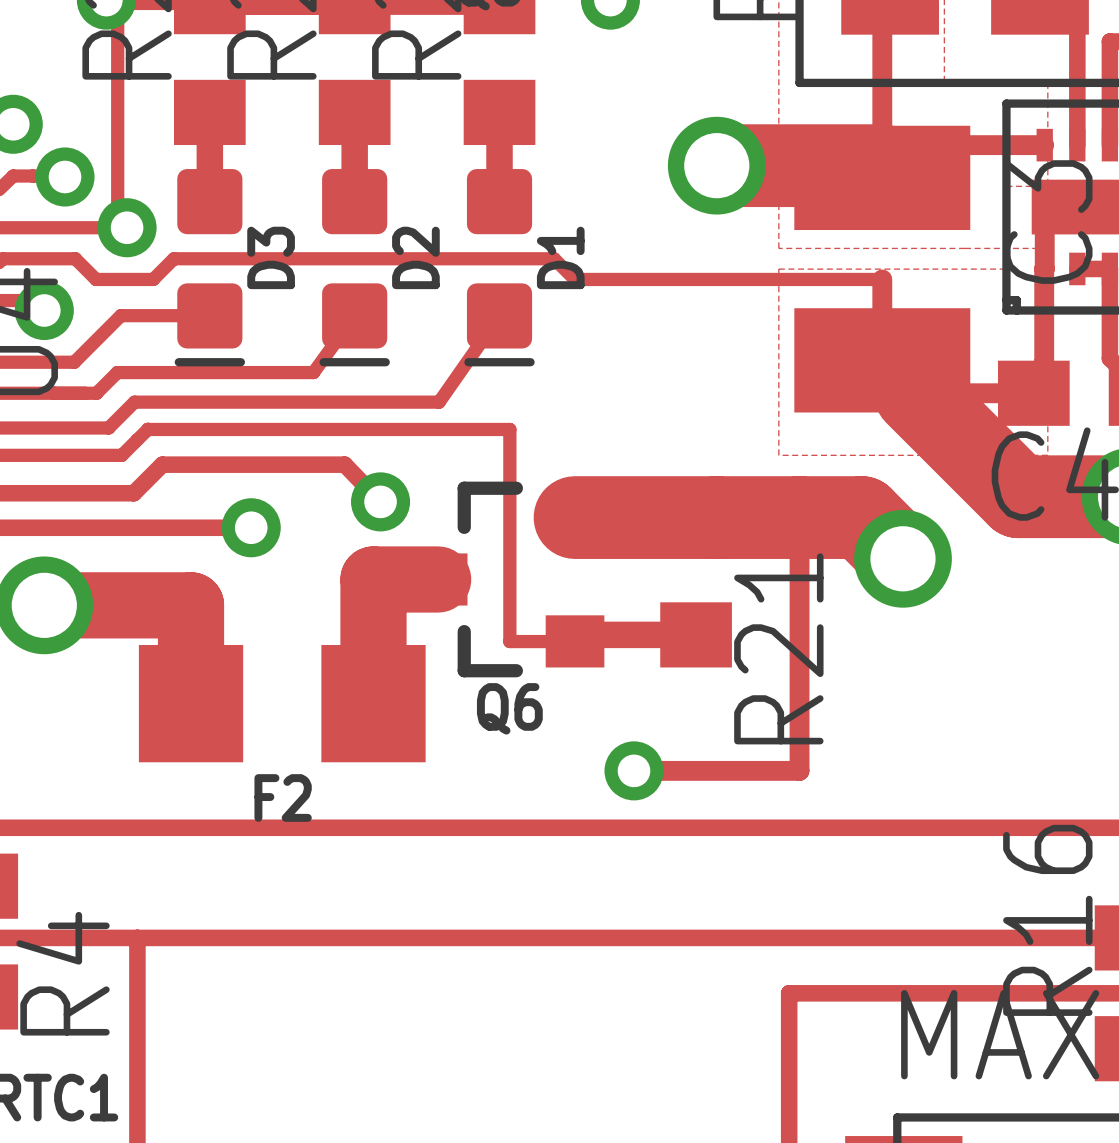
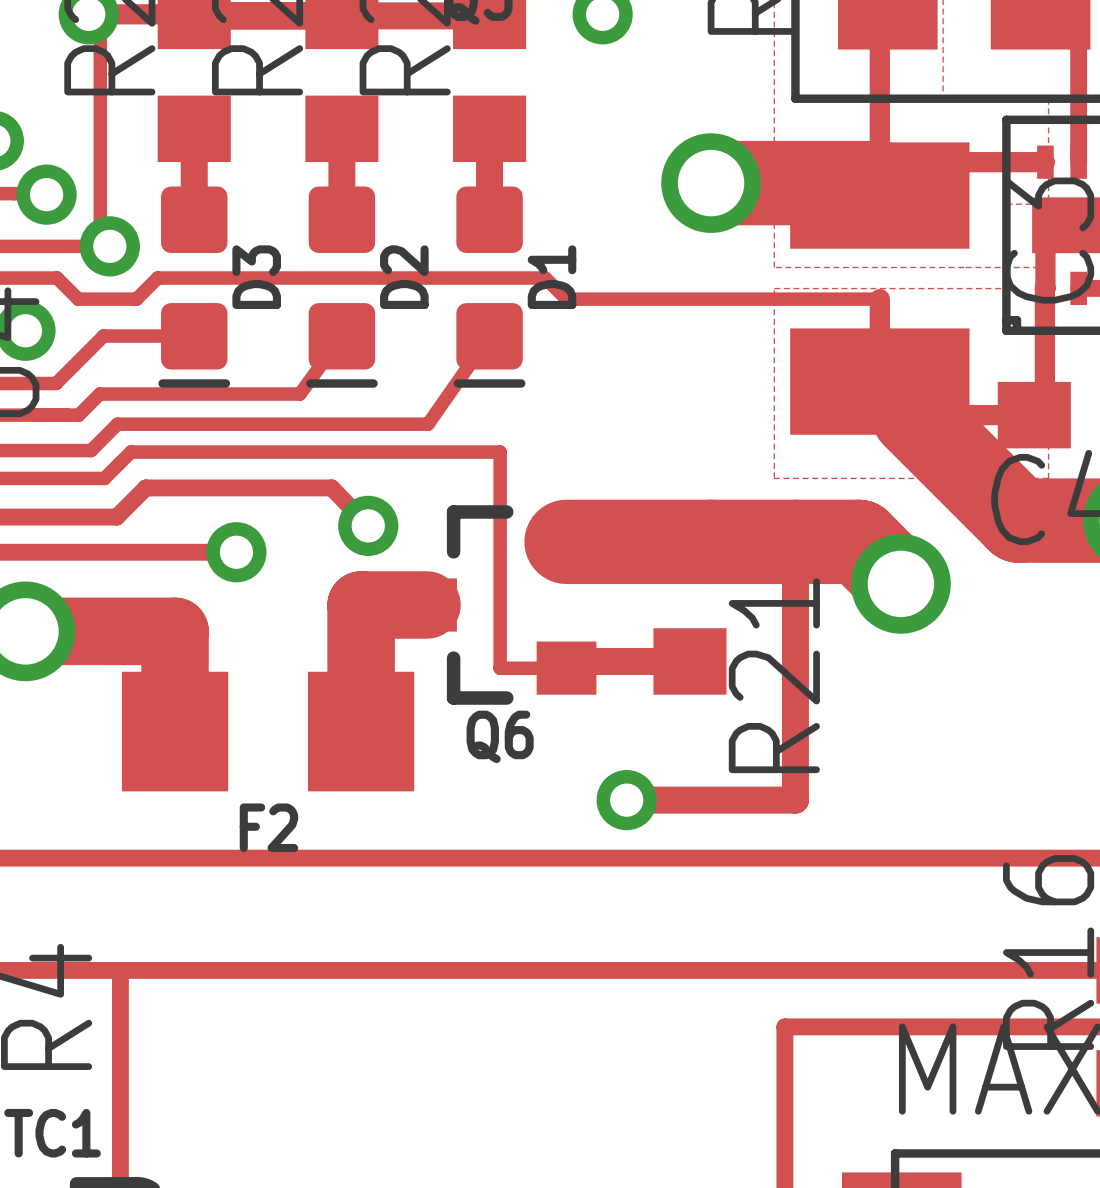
track width: thin (799, 517) (799, 770) (634, 770) -> thick (795, 541) (795, 800) (626, 800)

